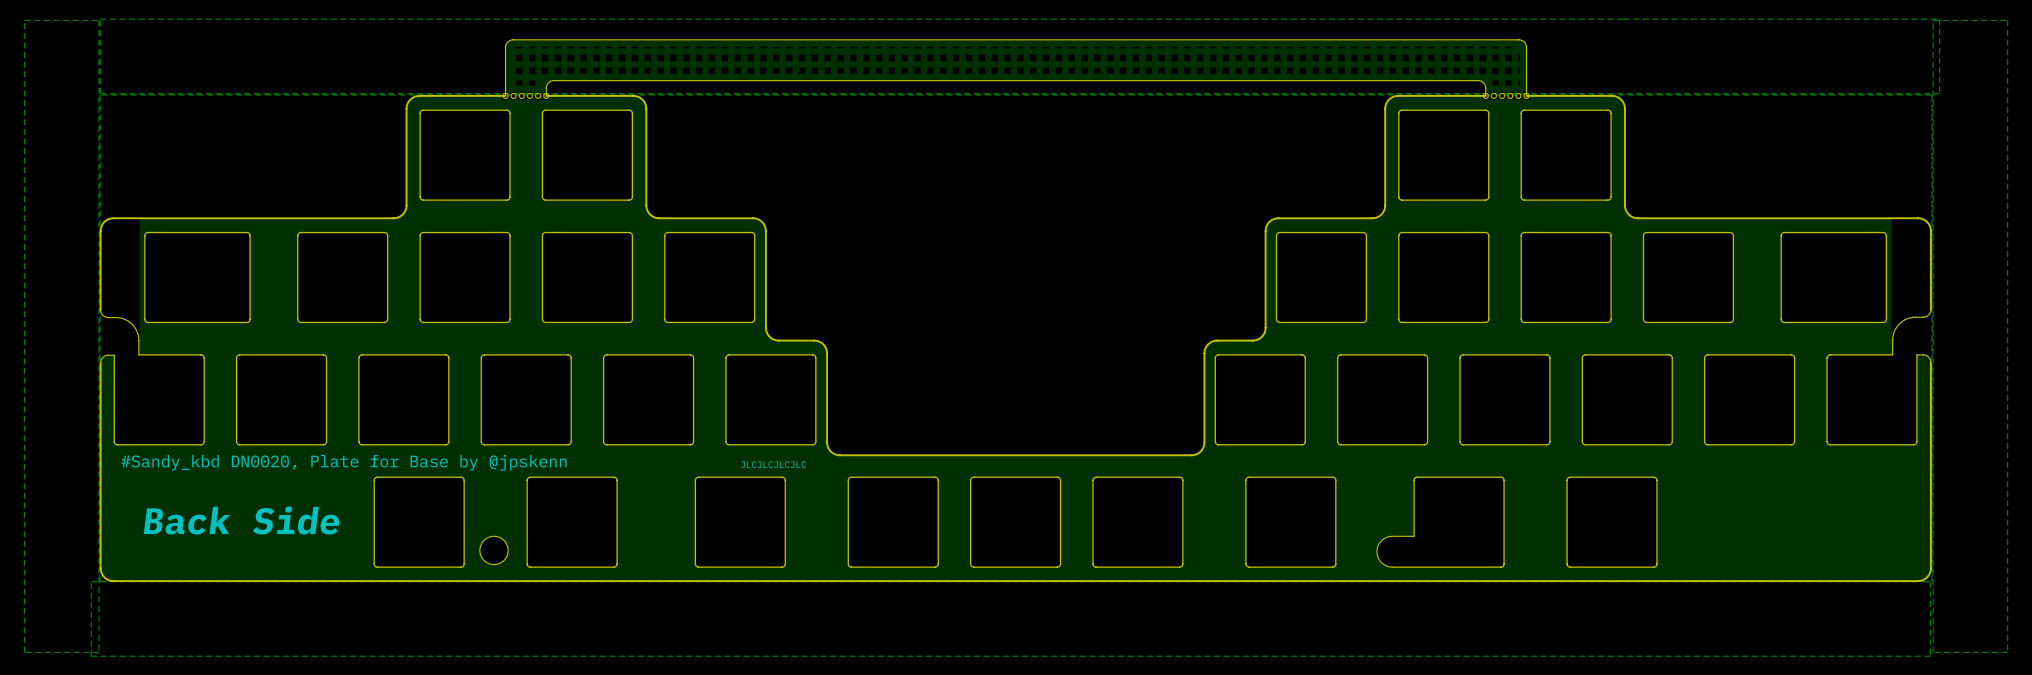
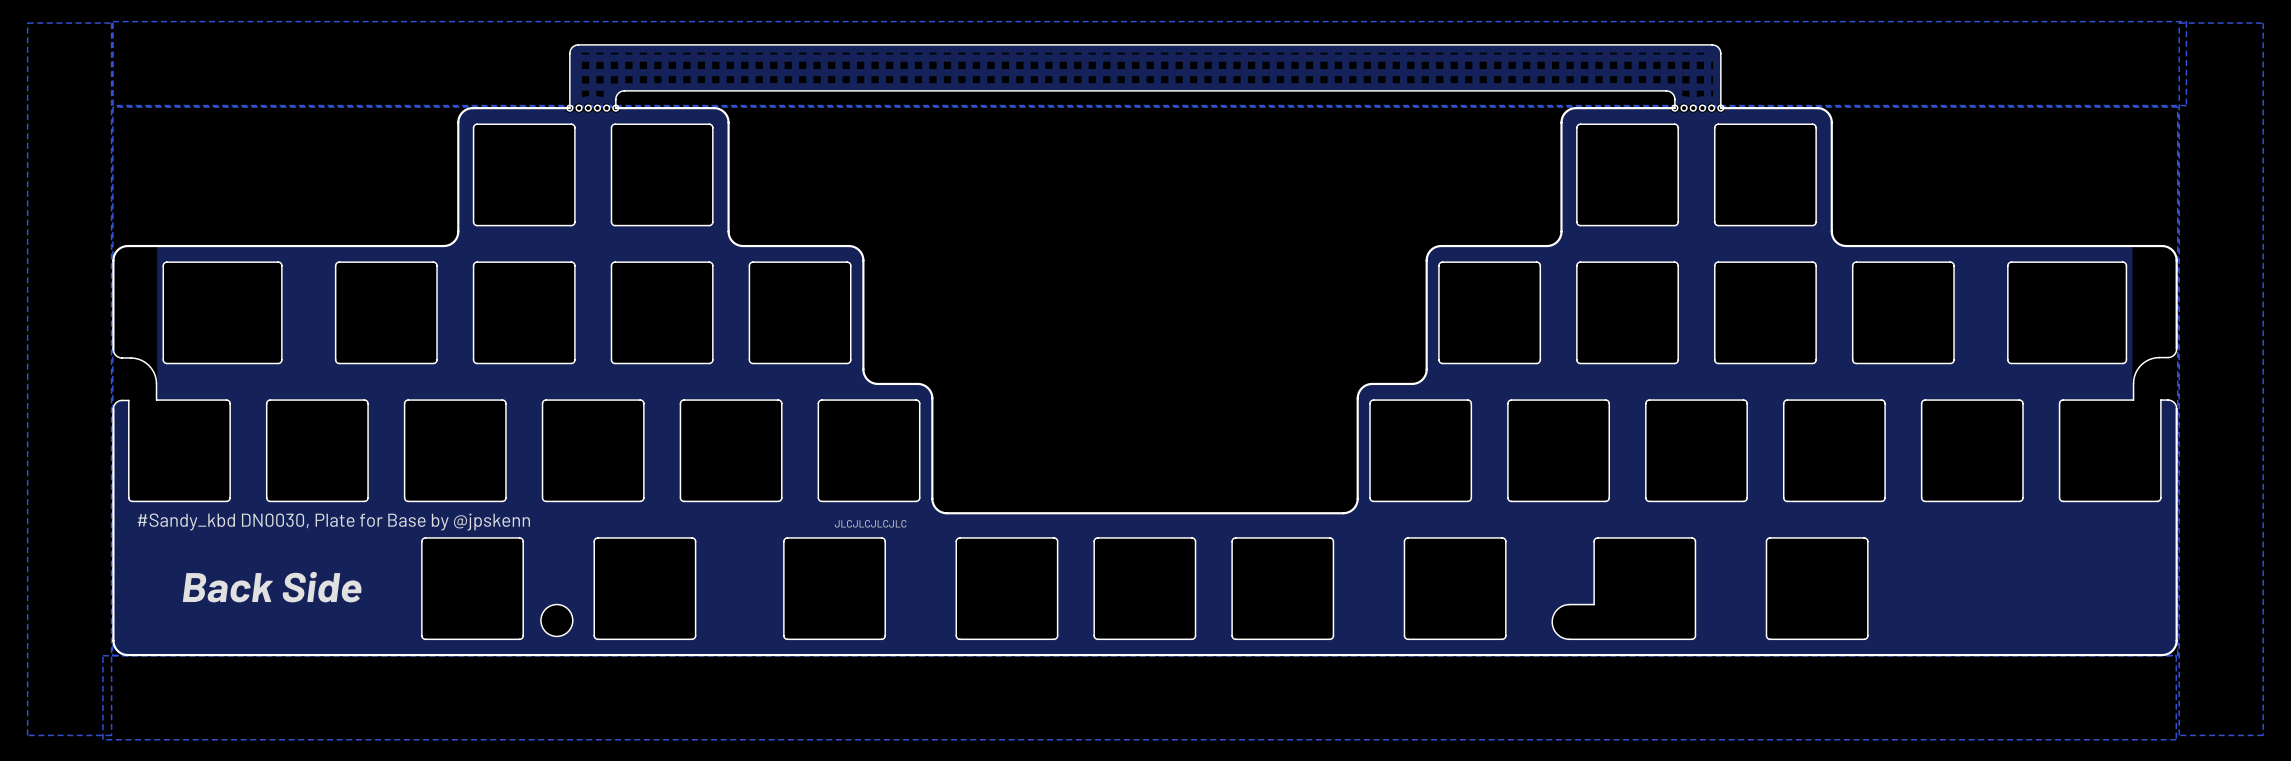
text: #Sandy_kbd DN0020, Plate for Base by @jpskenn (343, 462) -> #Sandy_kbd DN0030, Plate for Base by @jpskenn (333, 522)

